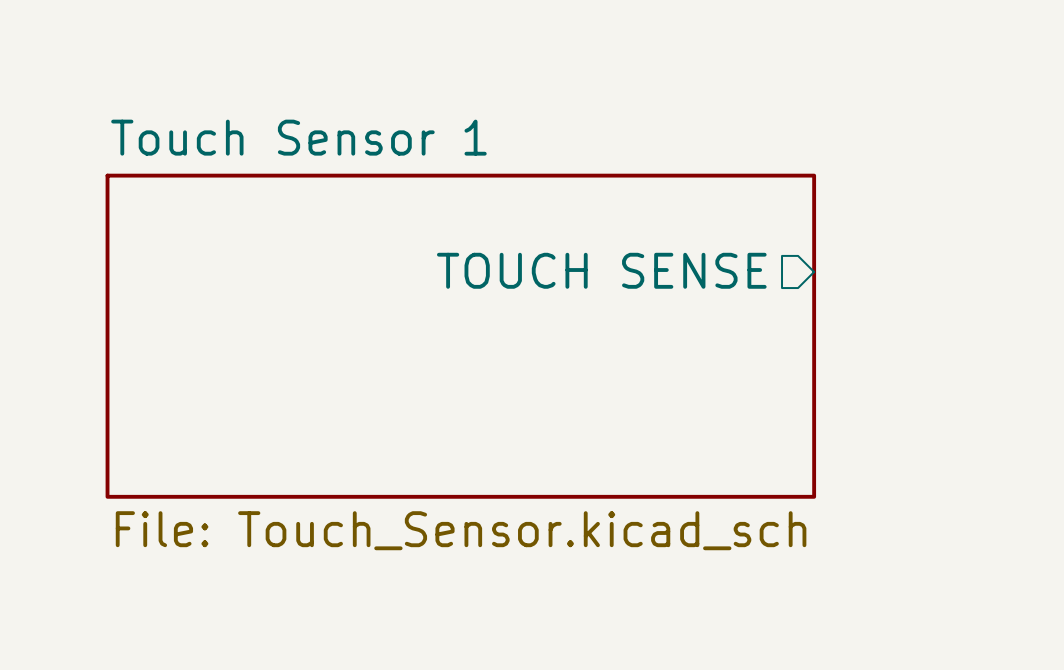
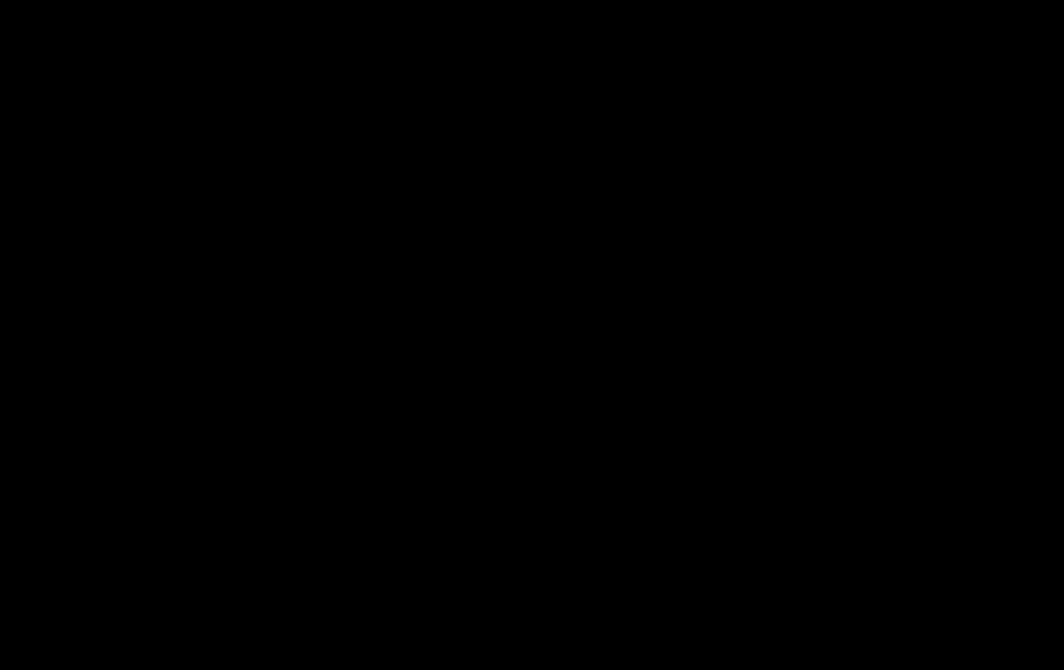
sheet pin: TOUCH SENSE (601, 270) -> none
sheet Touch Sensor 1: File: Touch_Sensor.kicad_sch (460, 336) -> none

